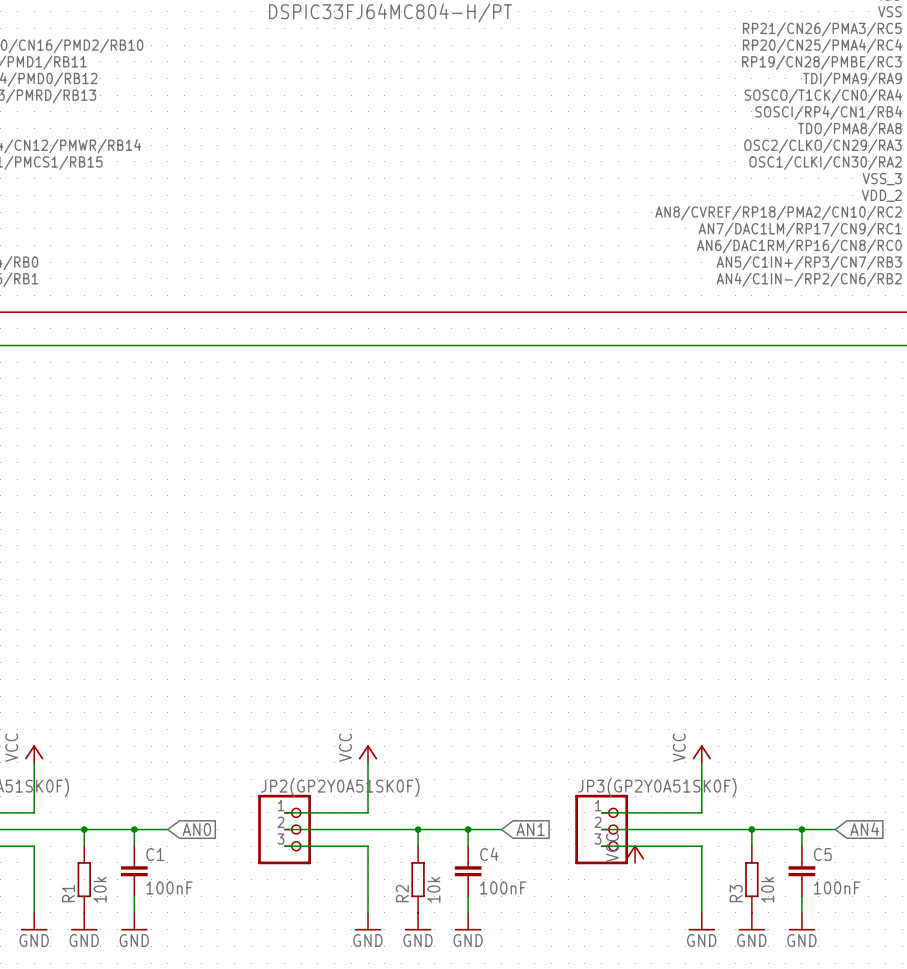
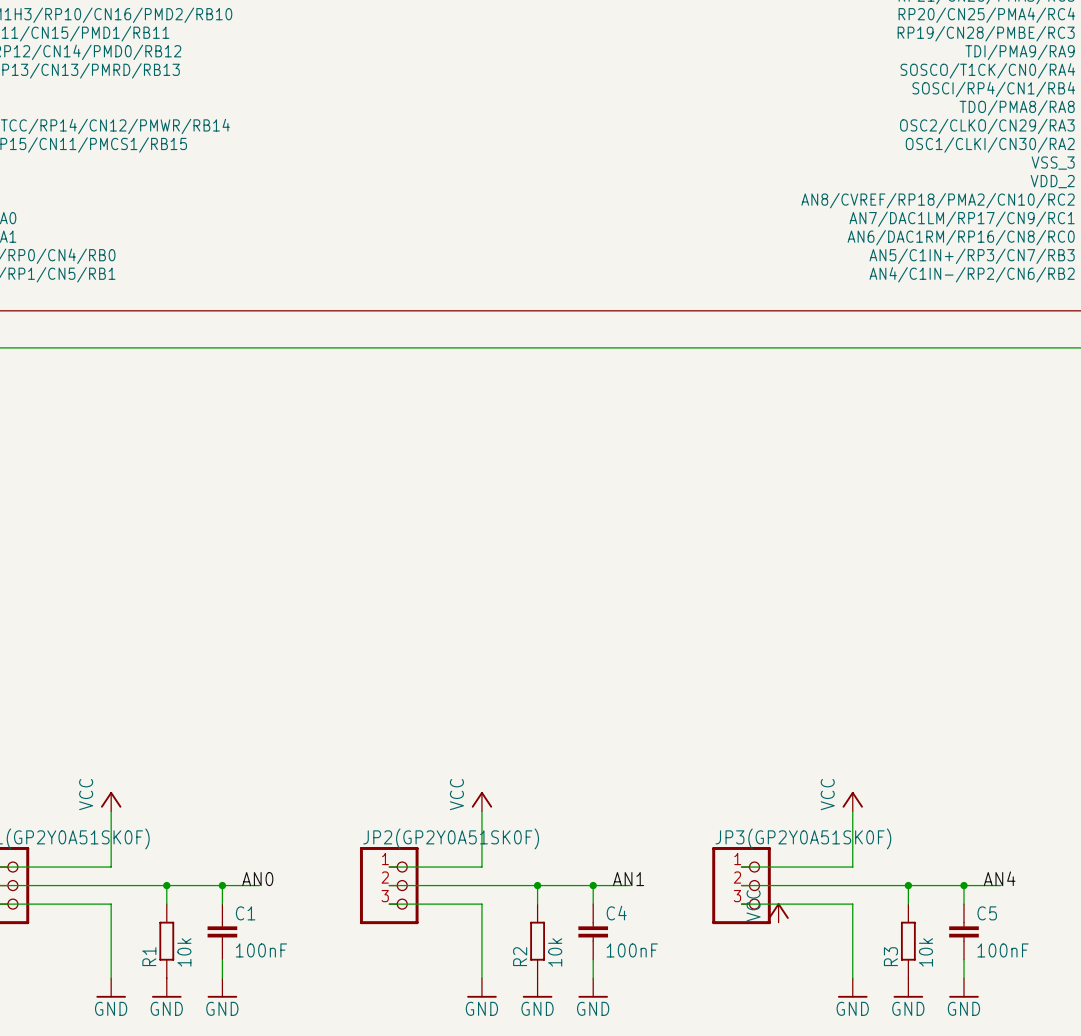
label: none -> AN0 (257, 879)
label: none -> AN1 (628, 879)
label: none -> AN4 (999, 878)
global label: AN0 (196, 829) -> none
global label: AN1 (530, 829) -> none
global label: AN4 (864, 829) -> none

